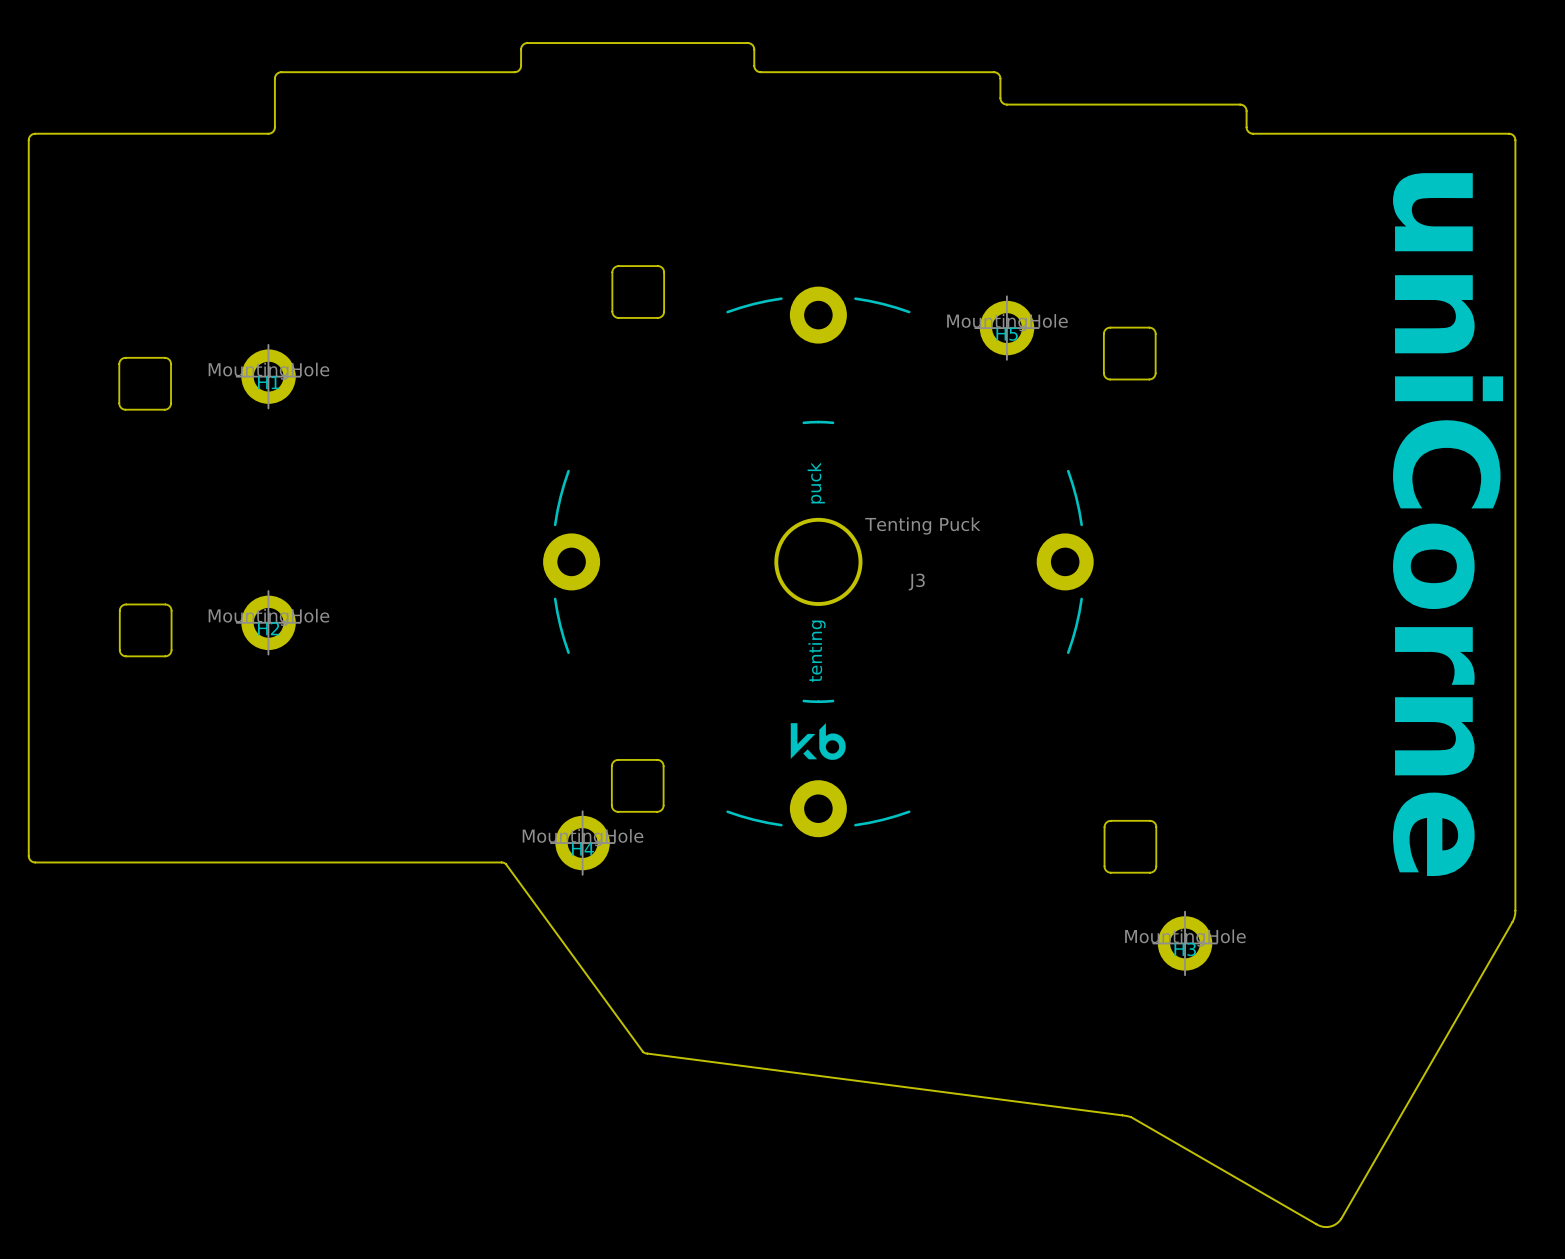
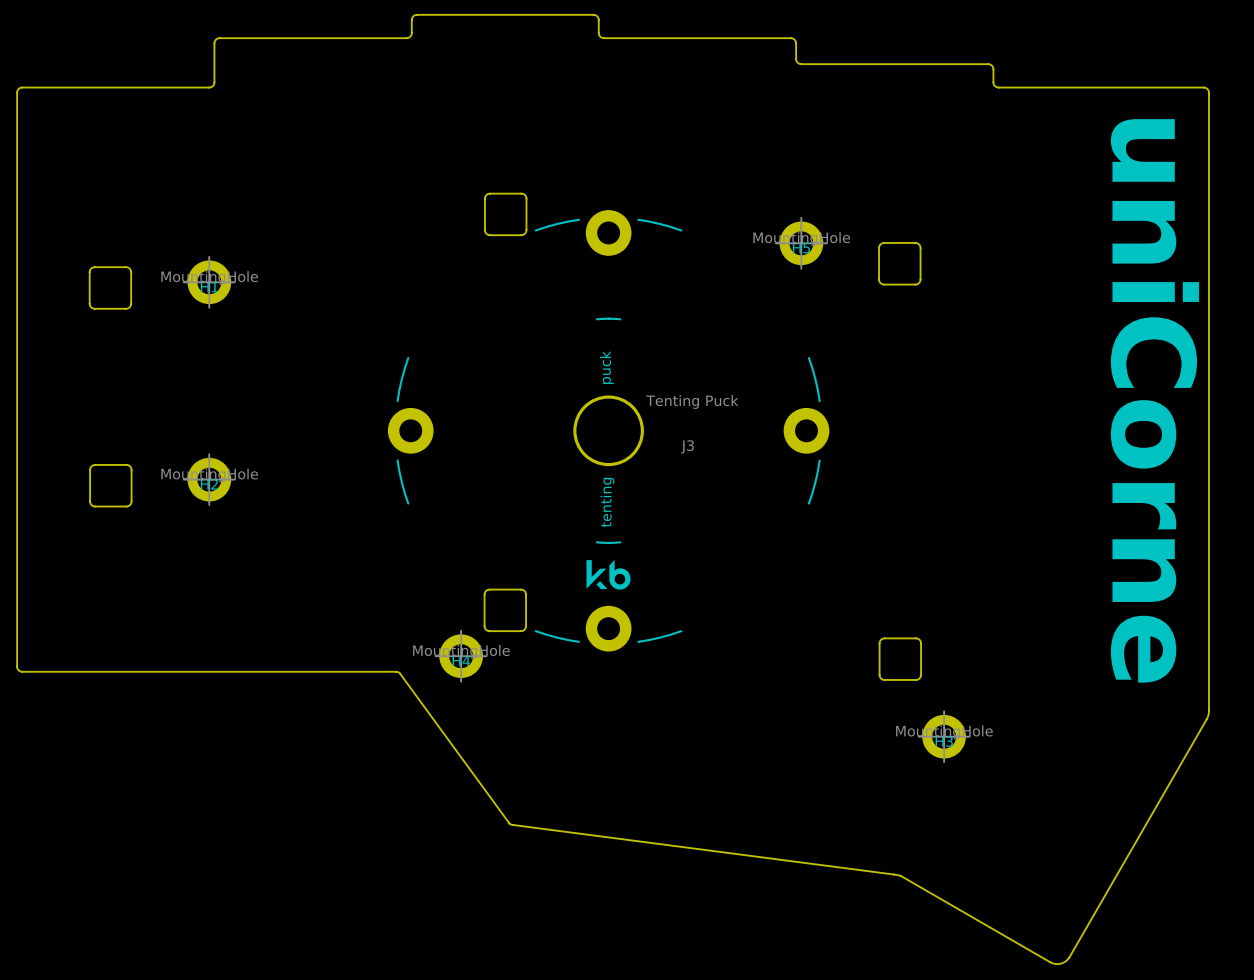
J3 position: (818, 561) -> (608, 430)

